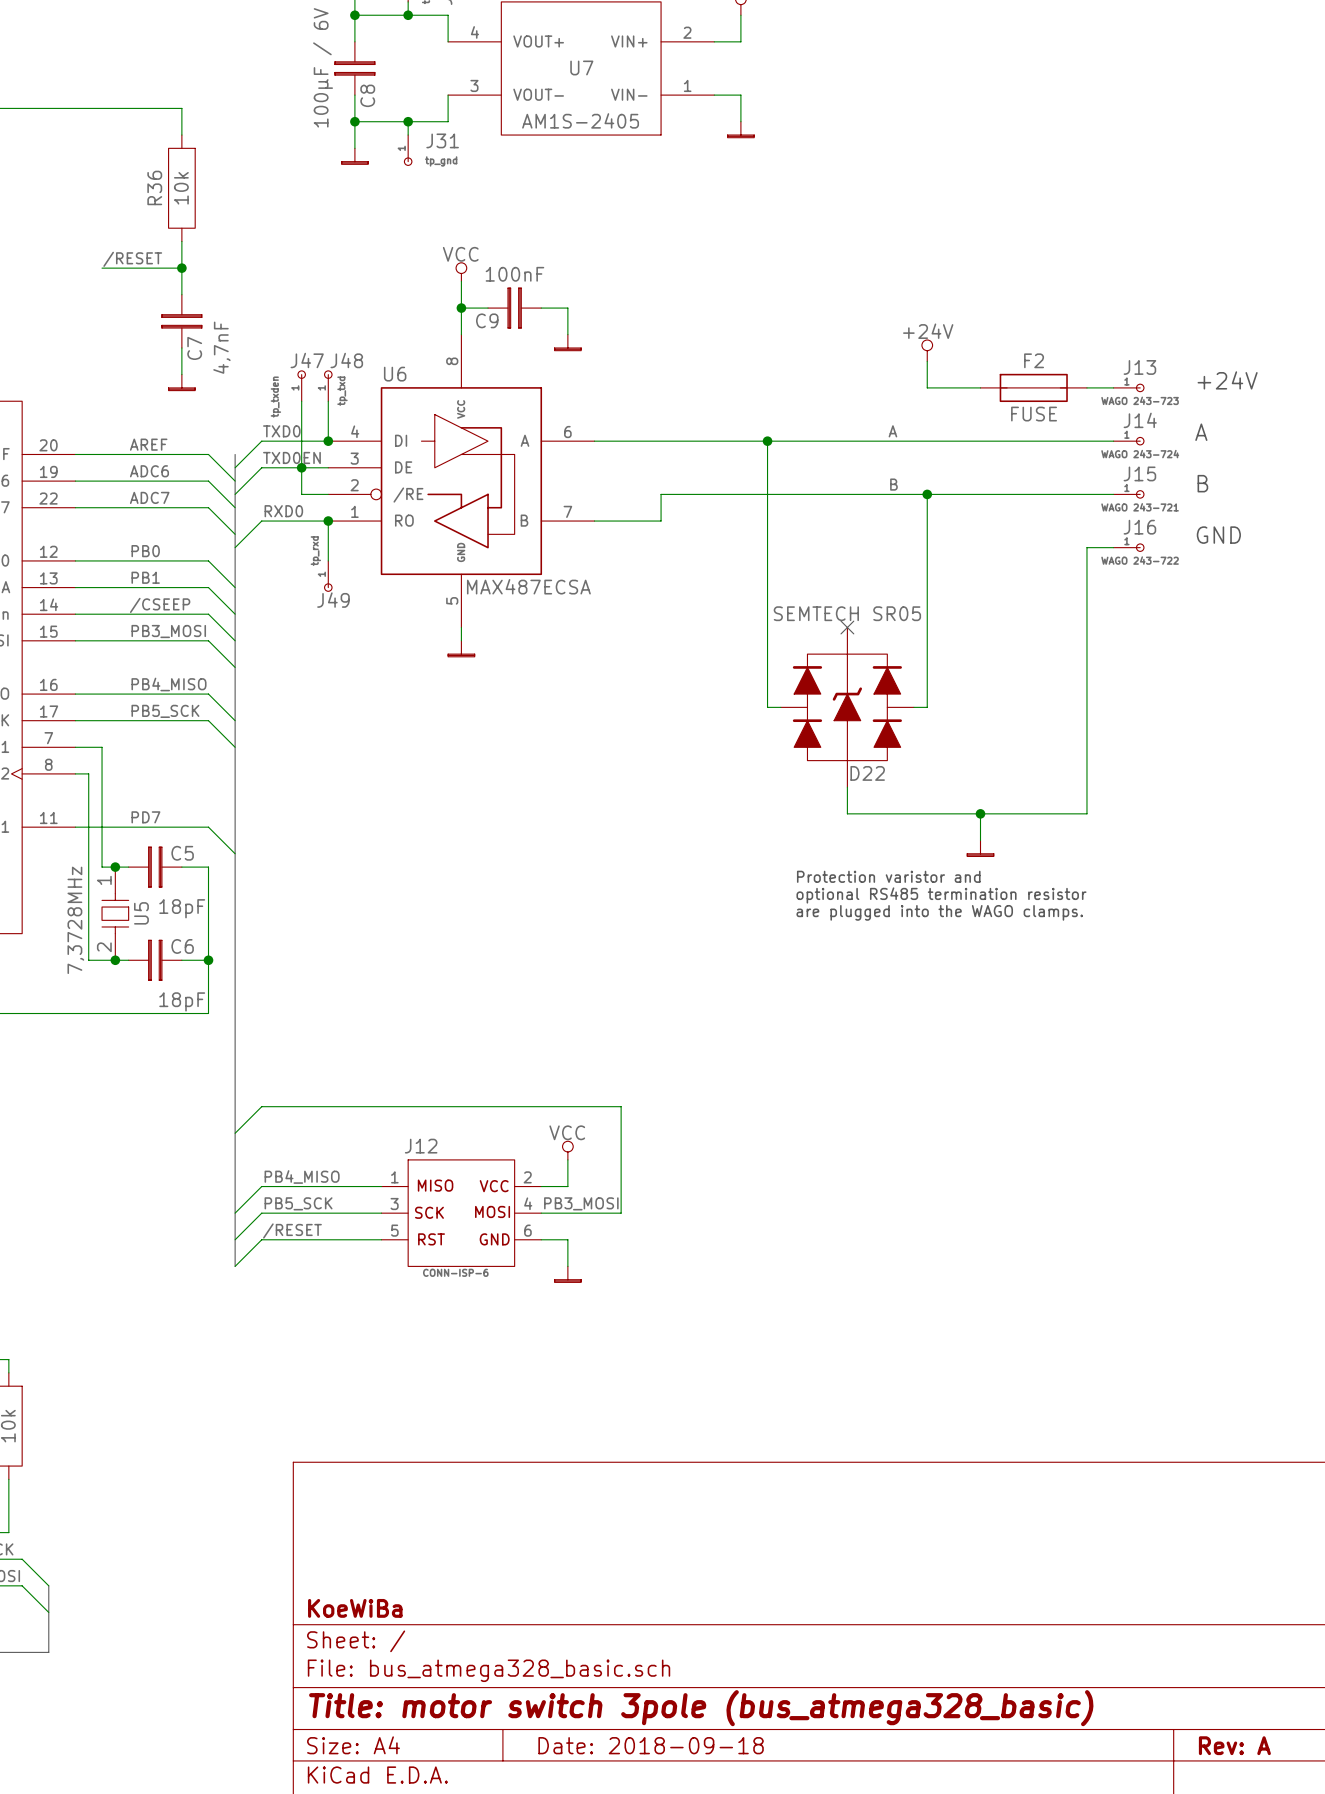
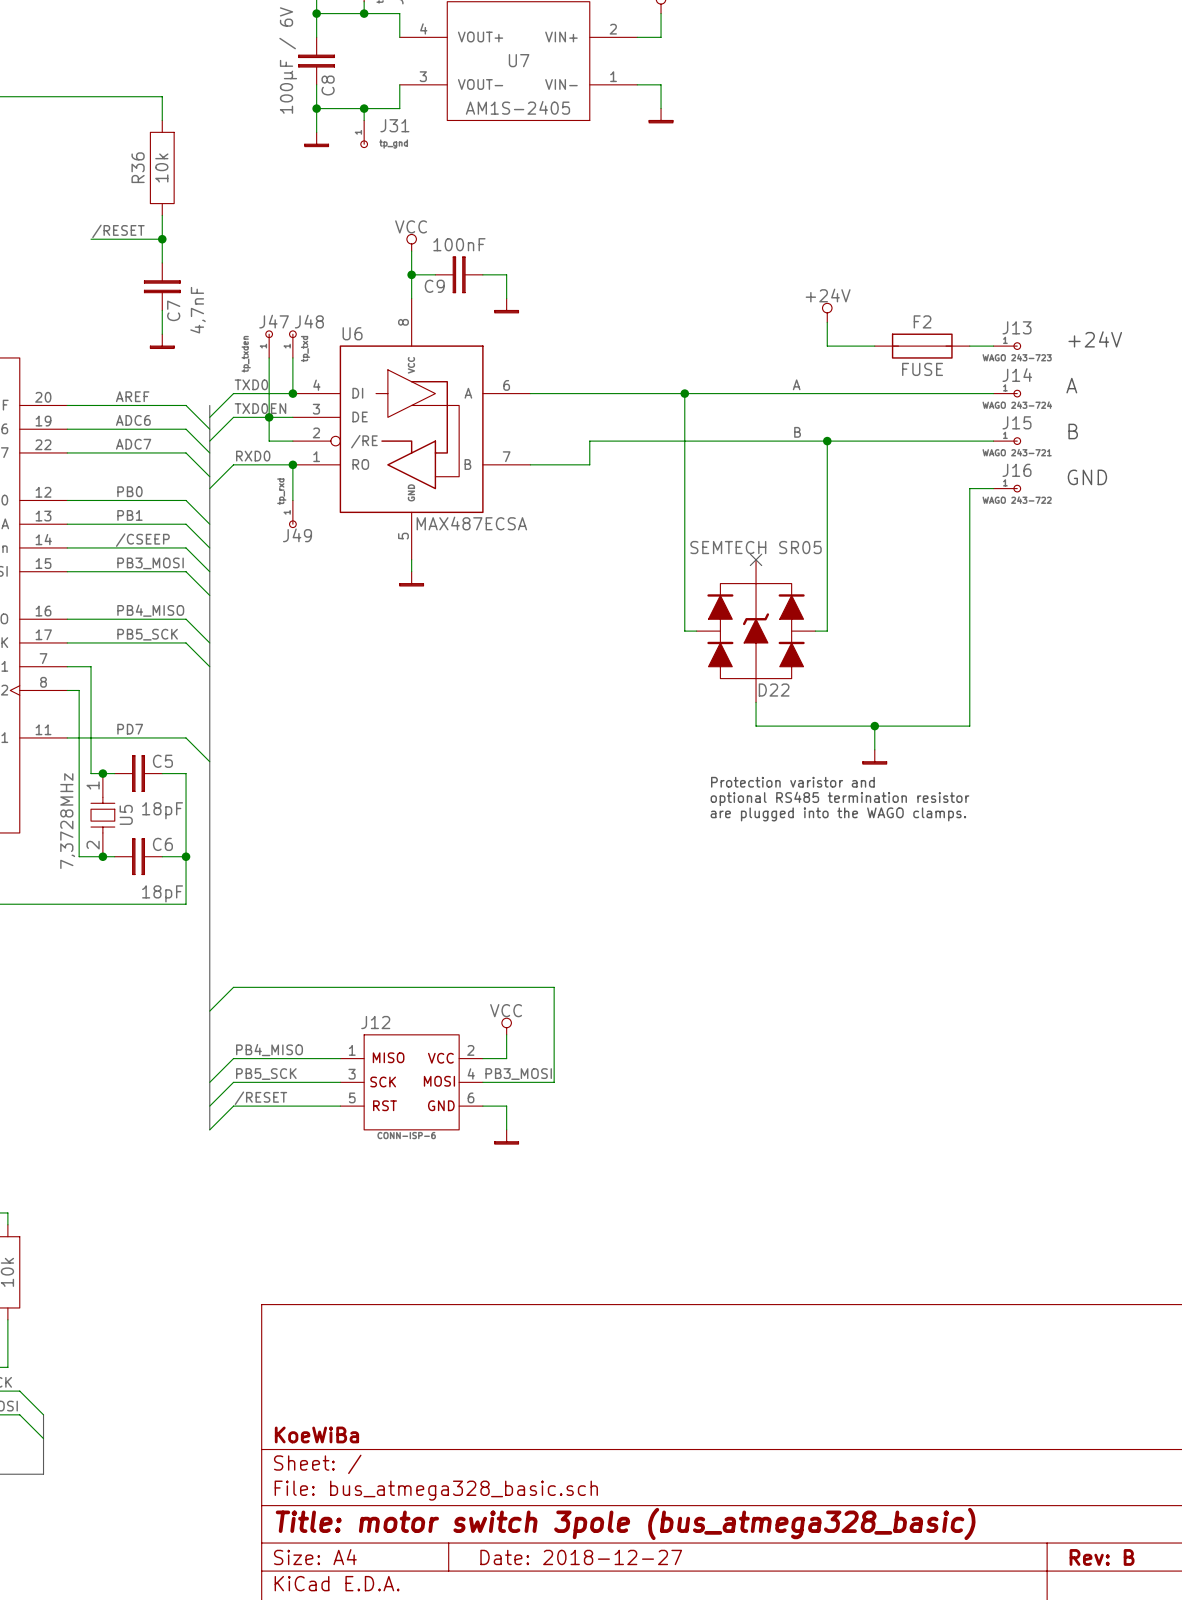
title block: Date: 2018-09-18 (651, 1745) -> Date: 2018-12-27 (581, 1557)
title block: Rev: A (1234, 1745) -> Rev: B (1102, 1557)

